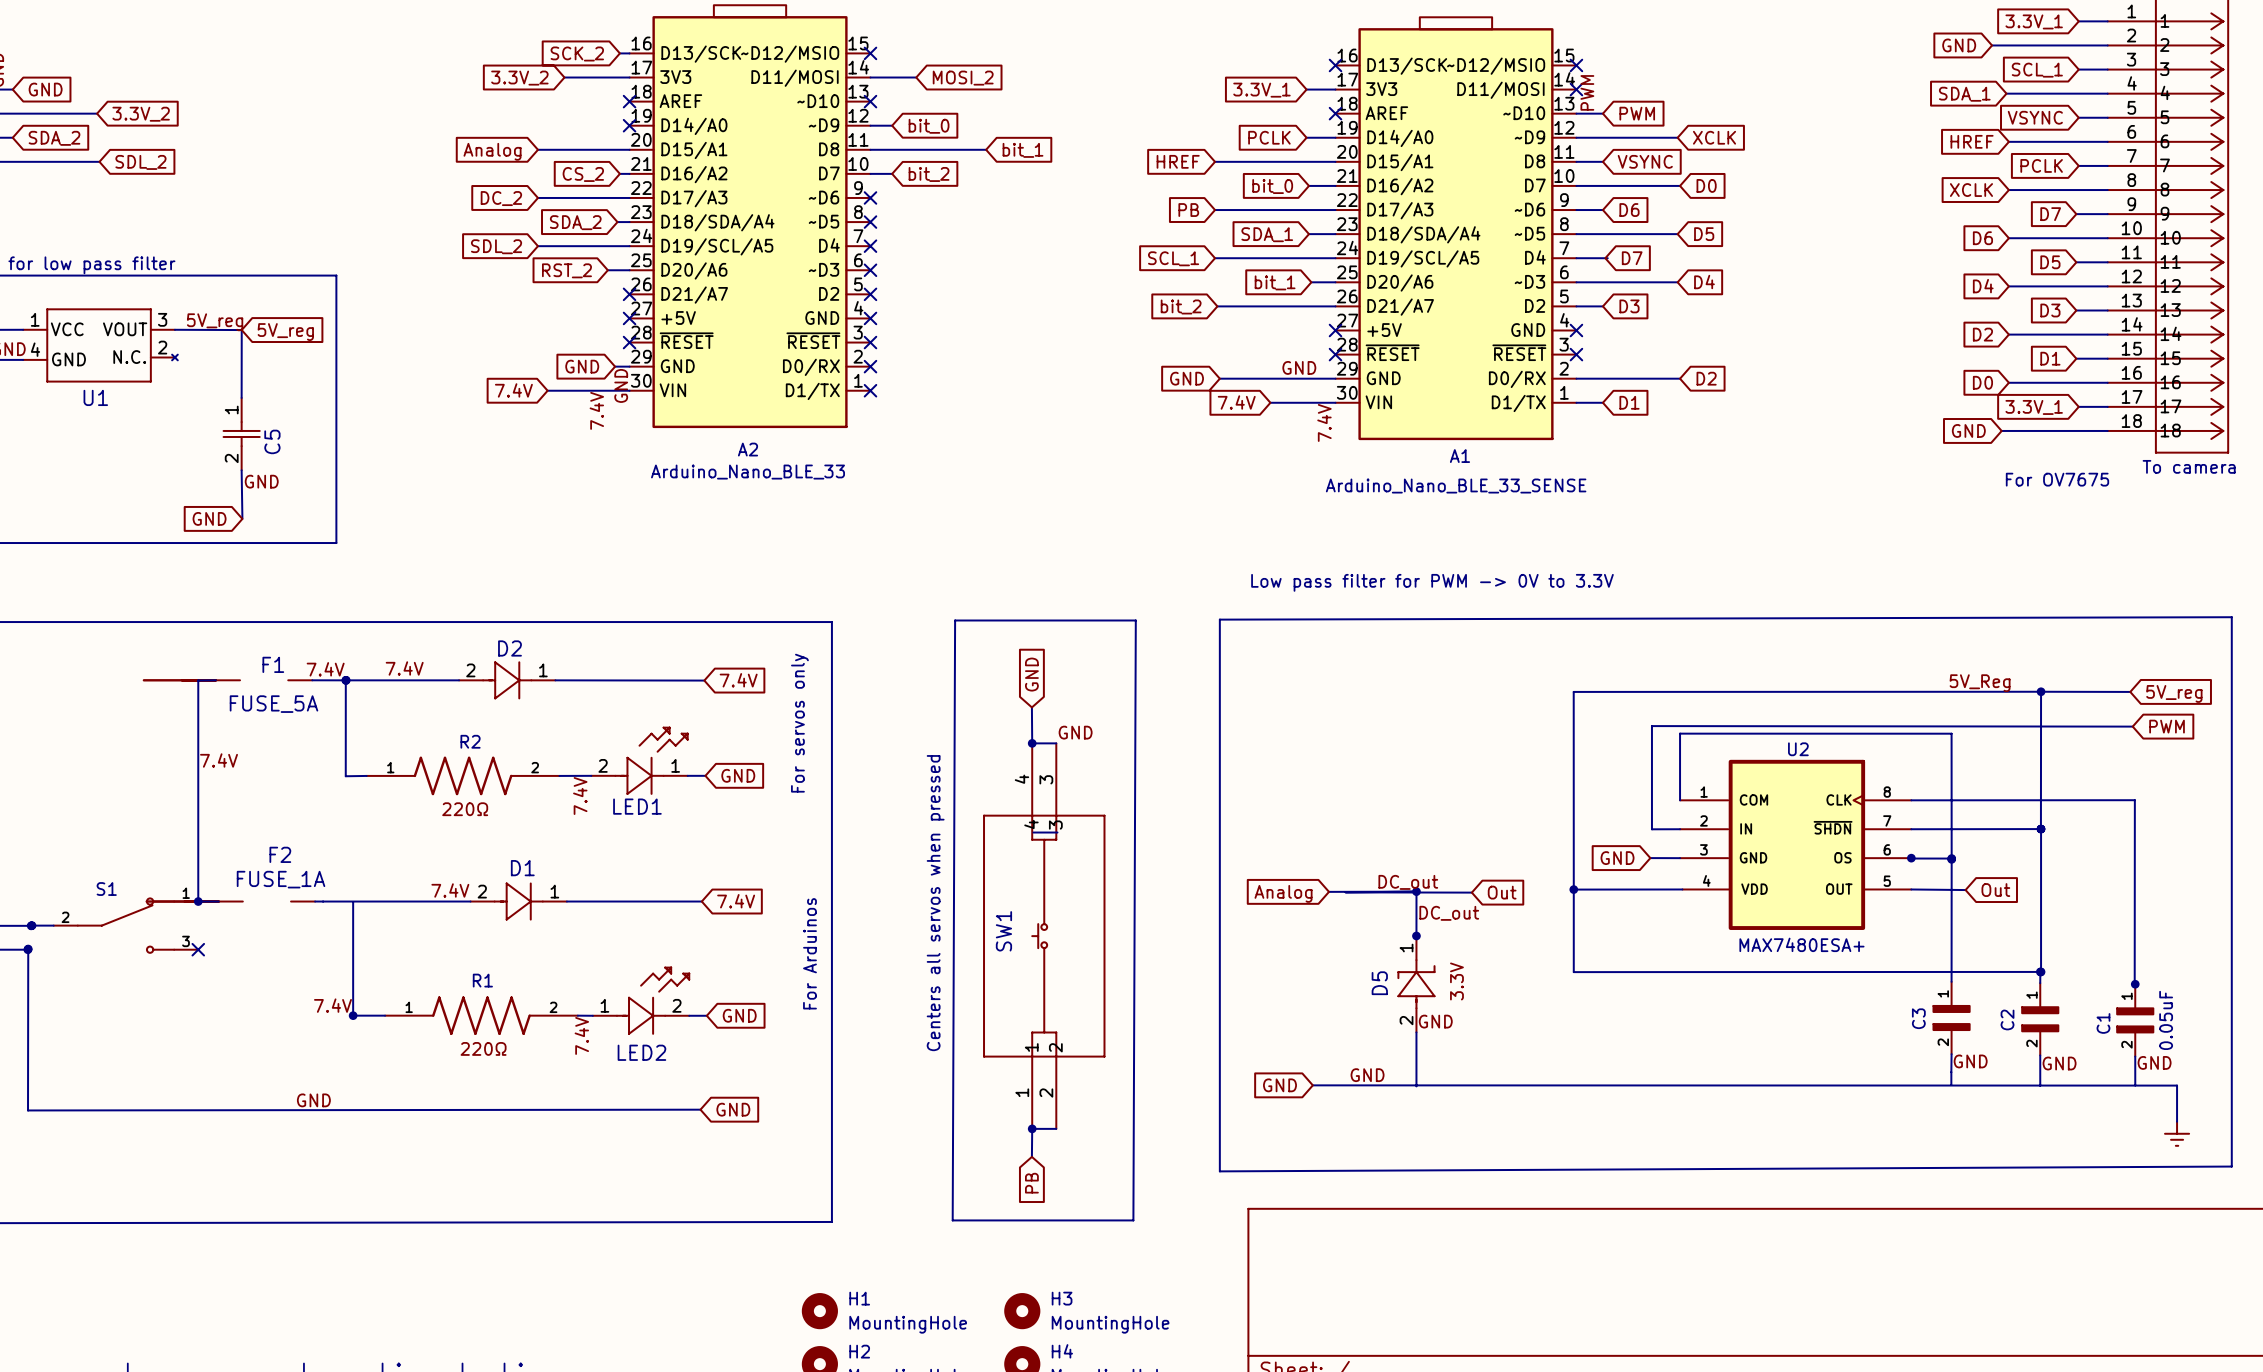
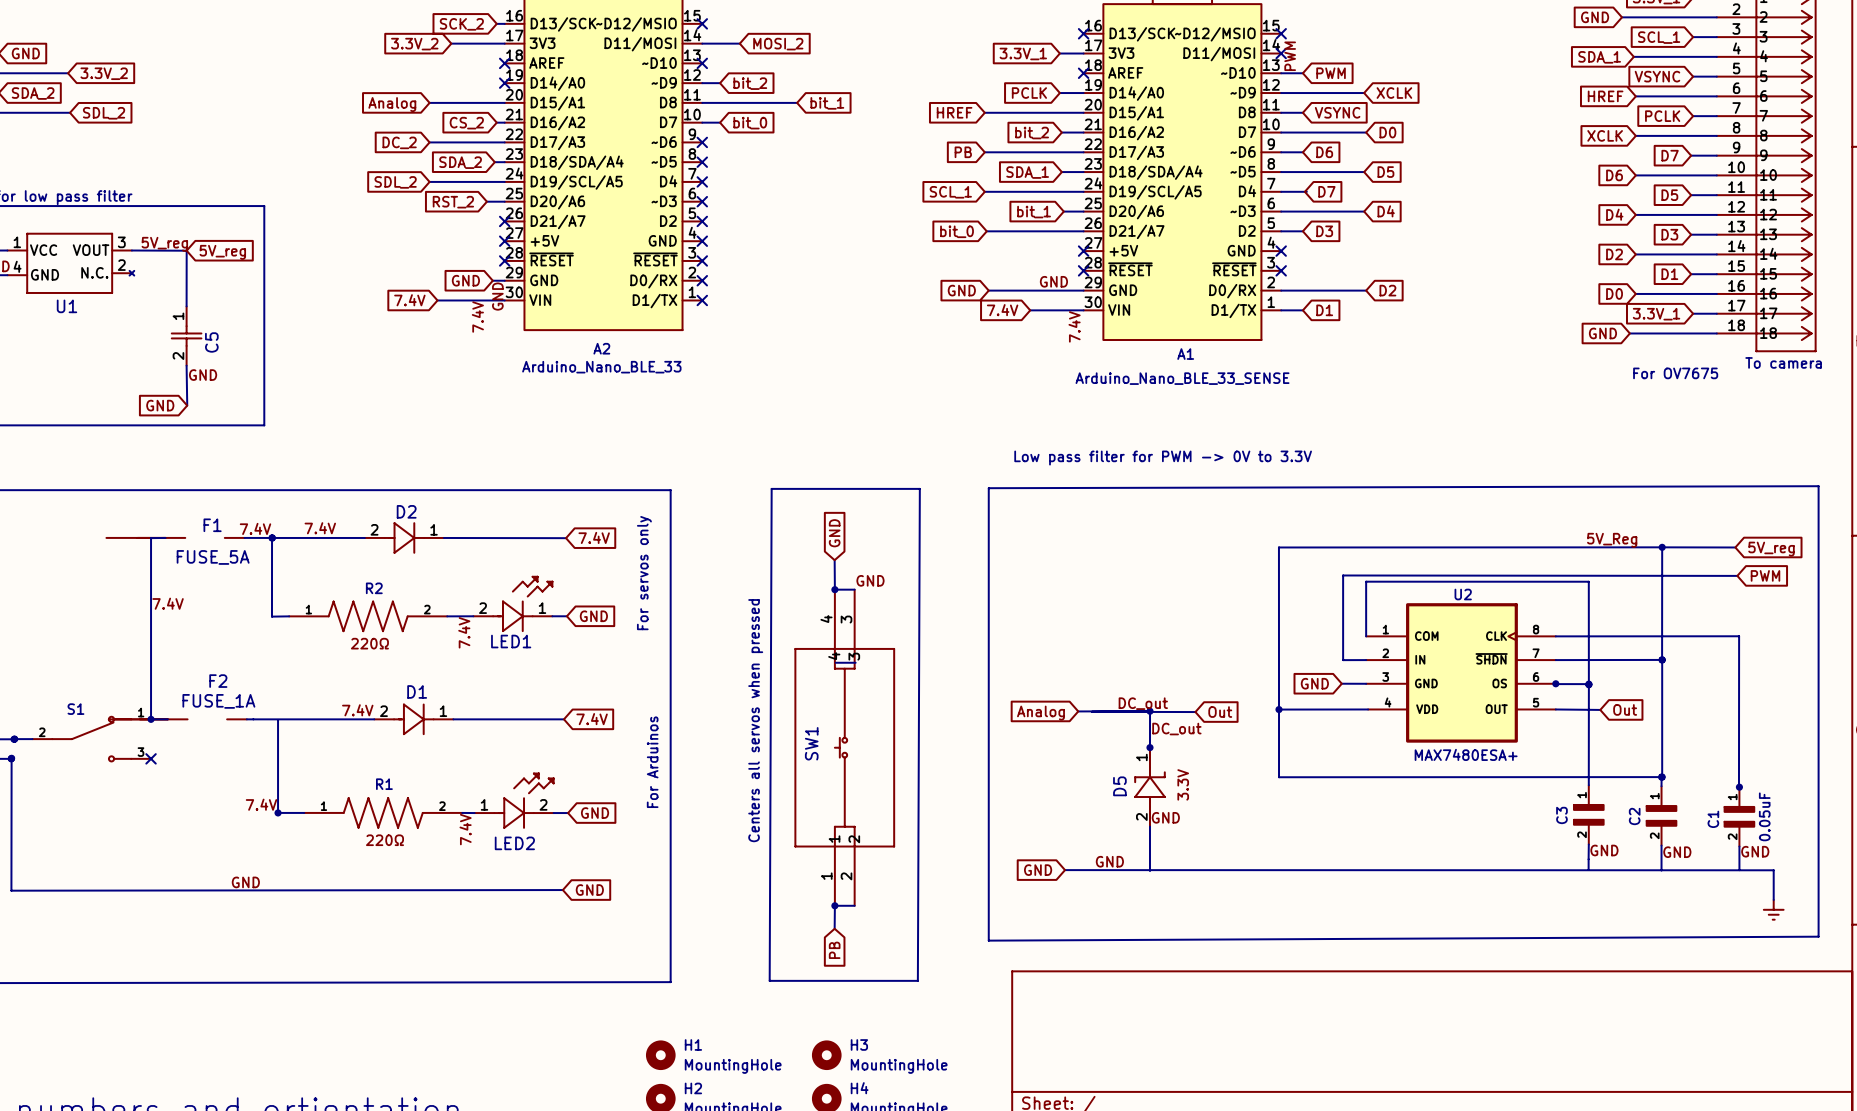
global label: bit_0 (929, 126) -> bit_2 (750, 83)
global label: bit_2 (929, 174) -> bit_0 (750, 123)
global label: bit_0 (1272, 186) -> bit_2 (1032, 133)
global label: bit_2 (1181, 306) -> bit_0 (957, 231)

